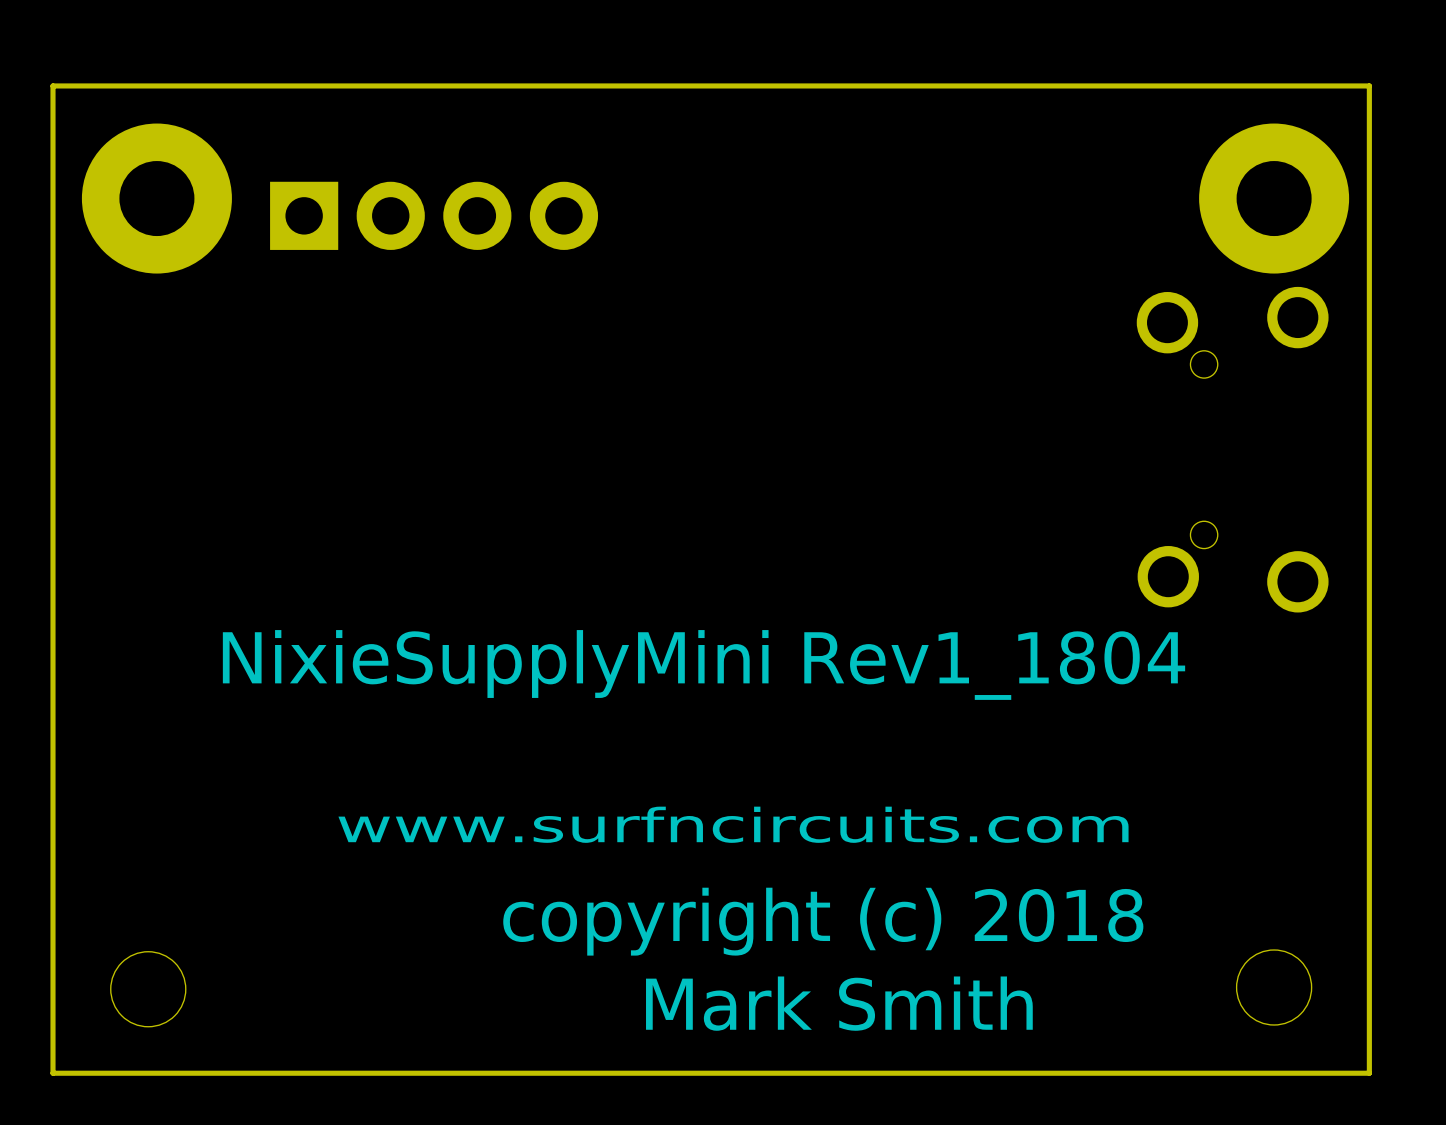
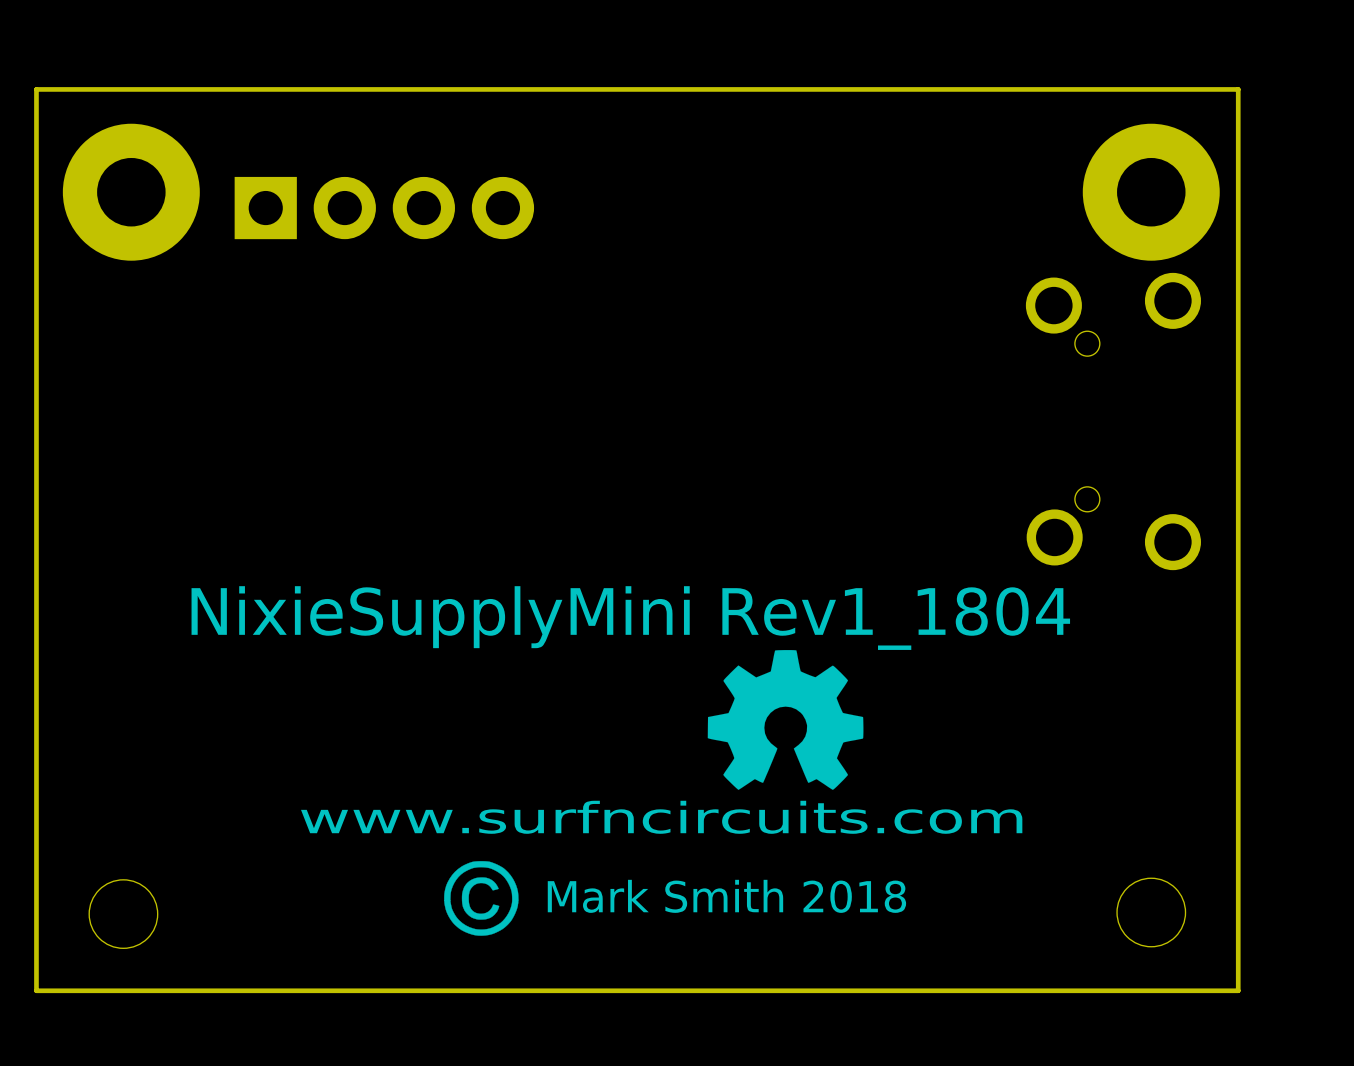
drawing: none -> [707, 650, 864, 790]
text position: www.surfncircuits.com (733, 824) -> www.surfncircuits.com (661, 817)
text: copyright (c) 2018 (823, 921) -> none
drawing: none -> [444, 861, 519, 936]
text: Mark Smith (839, 1003) -> Mark Smith 2018 (726, 896)

